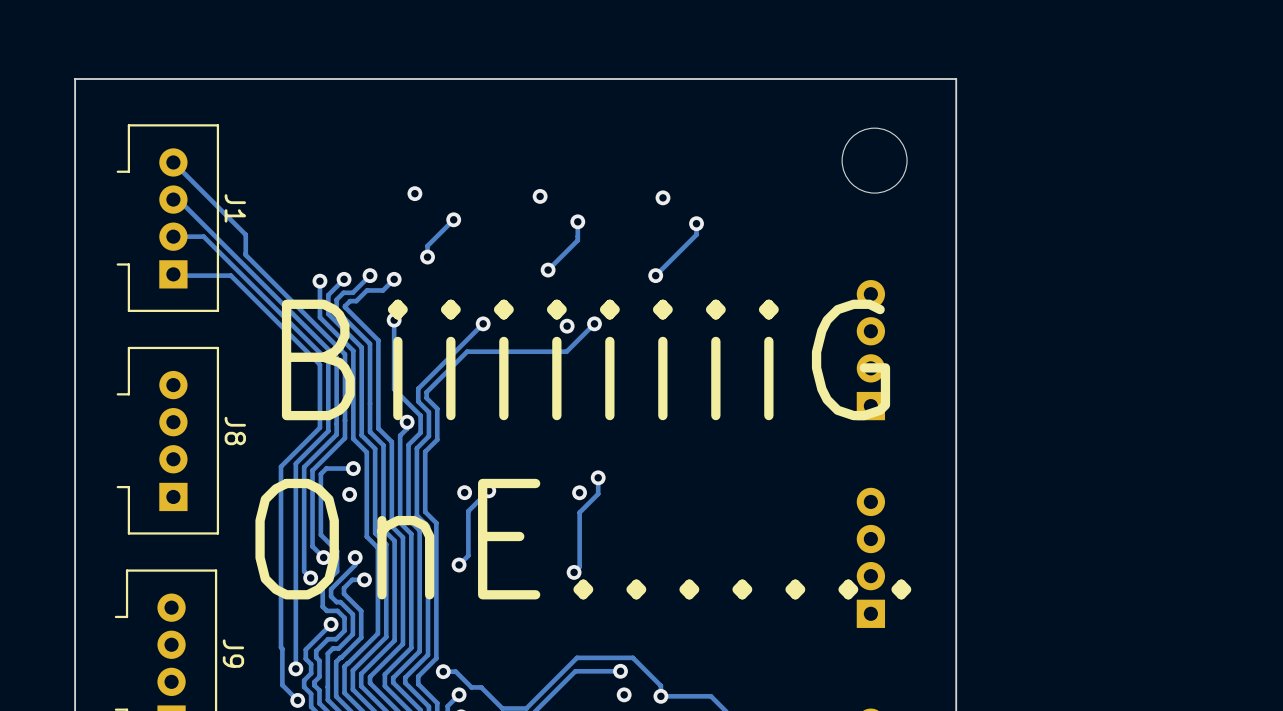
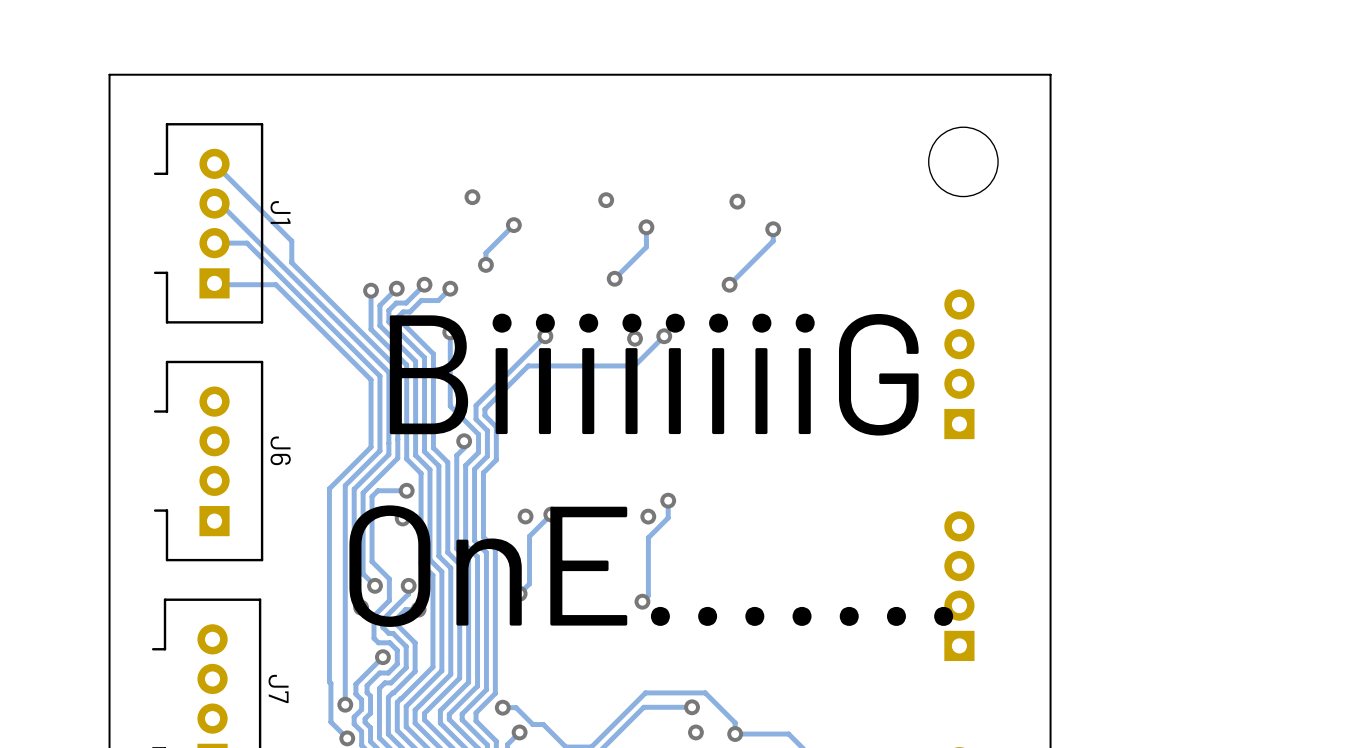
J8 name: J8 (235, 431) -> J6 (280, 450)
J9 name: J9 (233, 653) -> J7 (278, 688)

